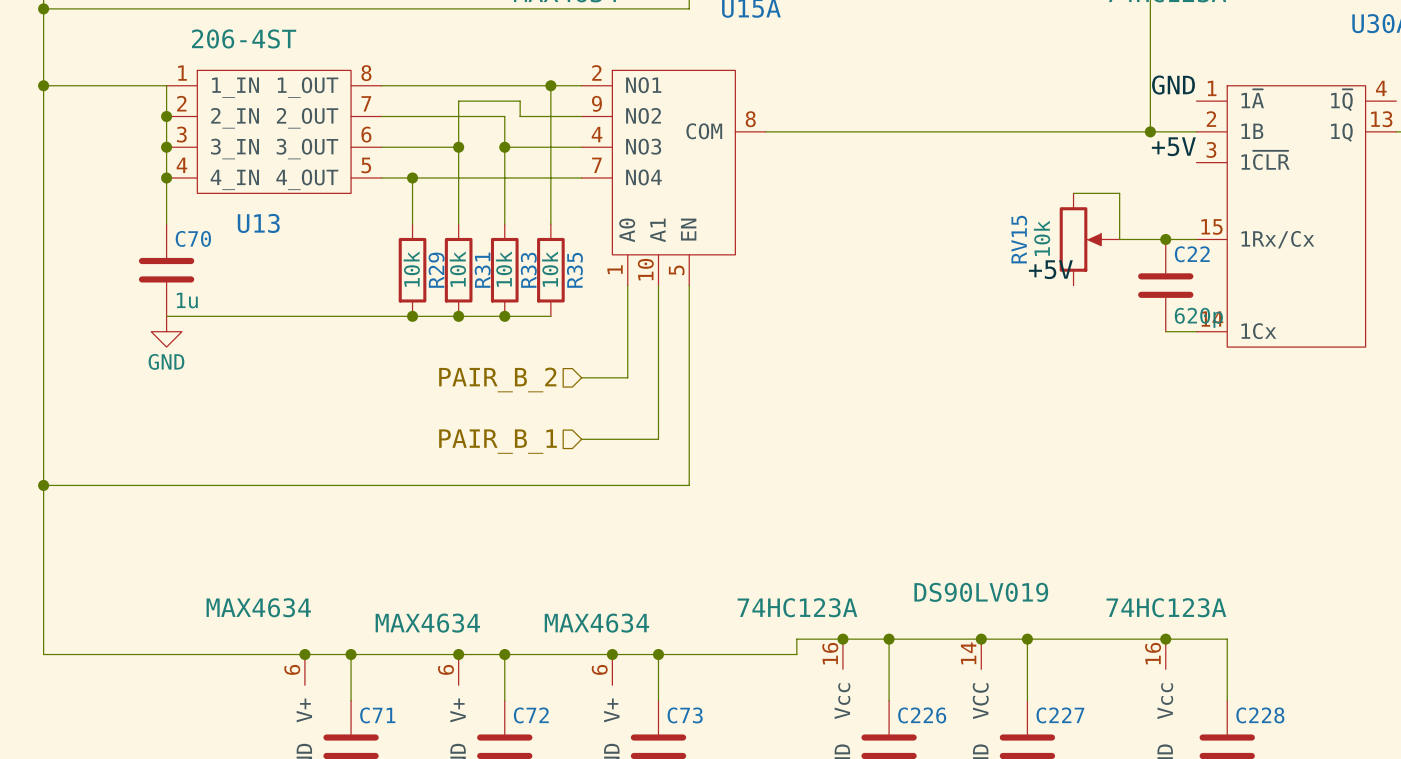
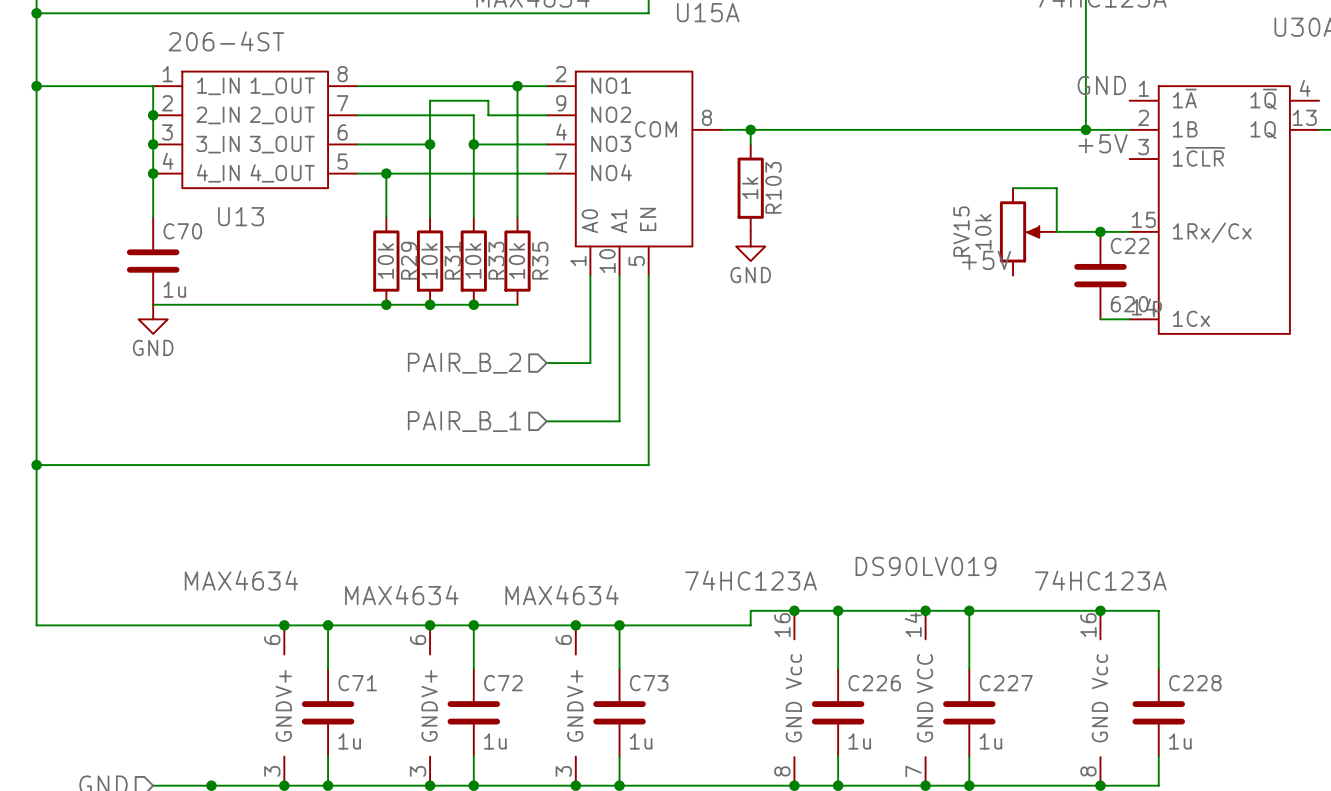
wire: none -> (750, 129) (750, 144)
junction: none -> (750, 129)
R103: none -> 1k (750, 188)
power symbol: none -> GND (750, 246)

